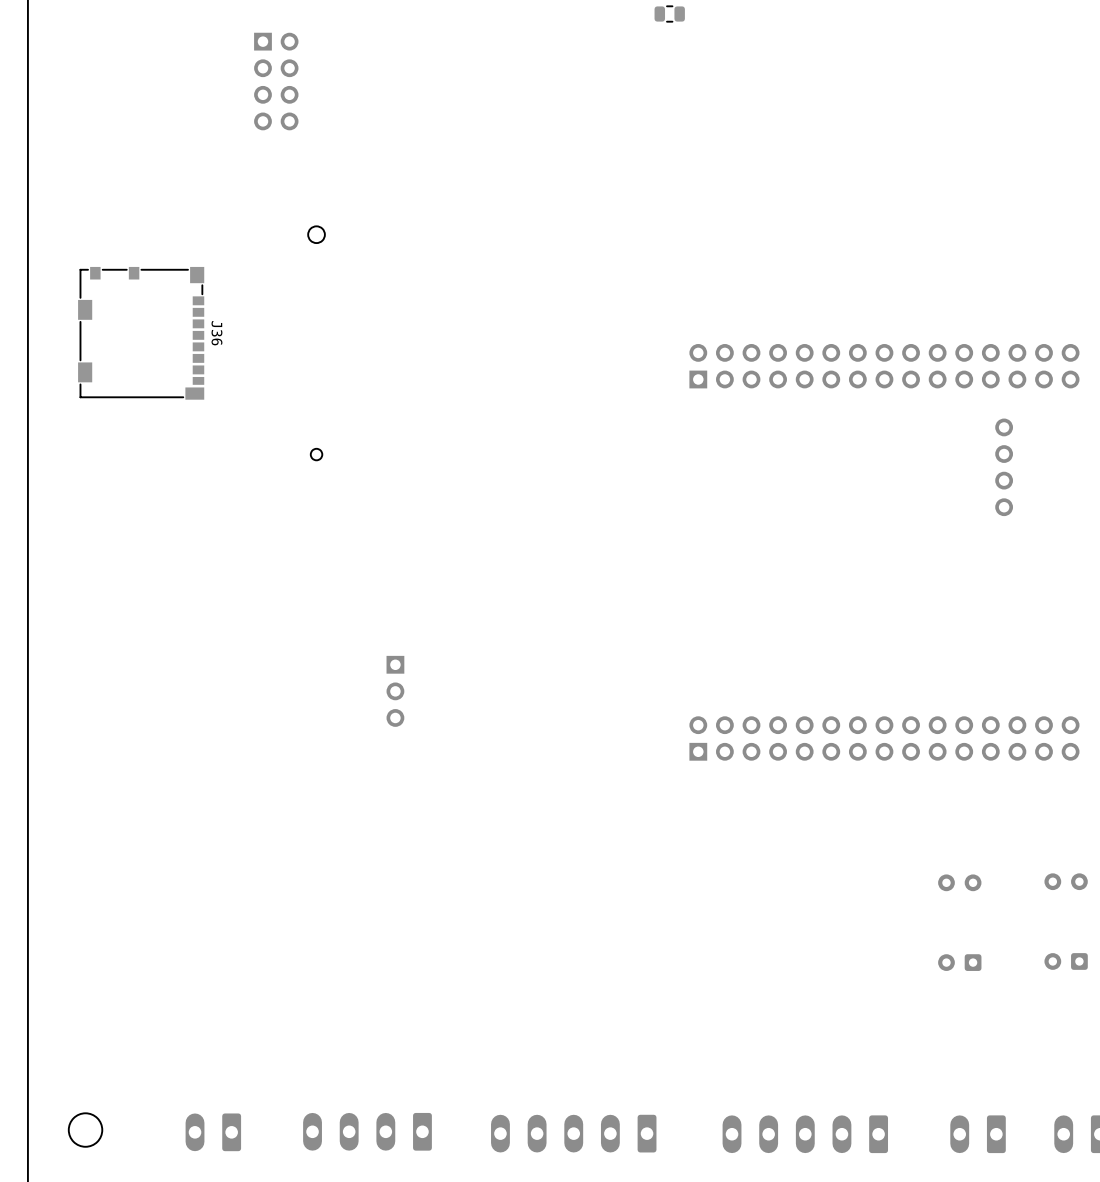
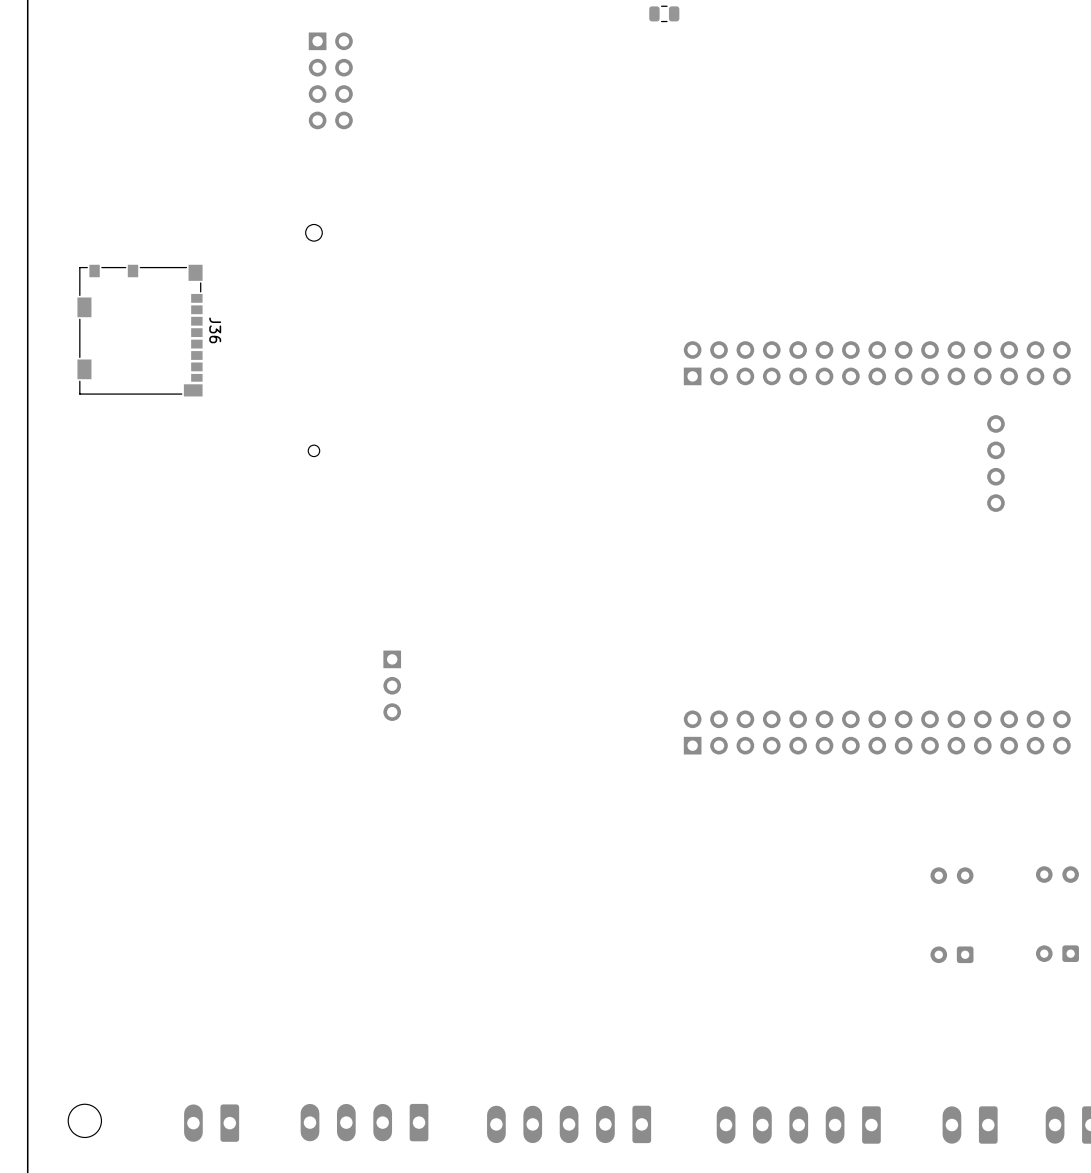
part position: (276, 81) -> (330, 80)

